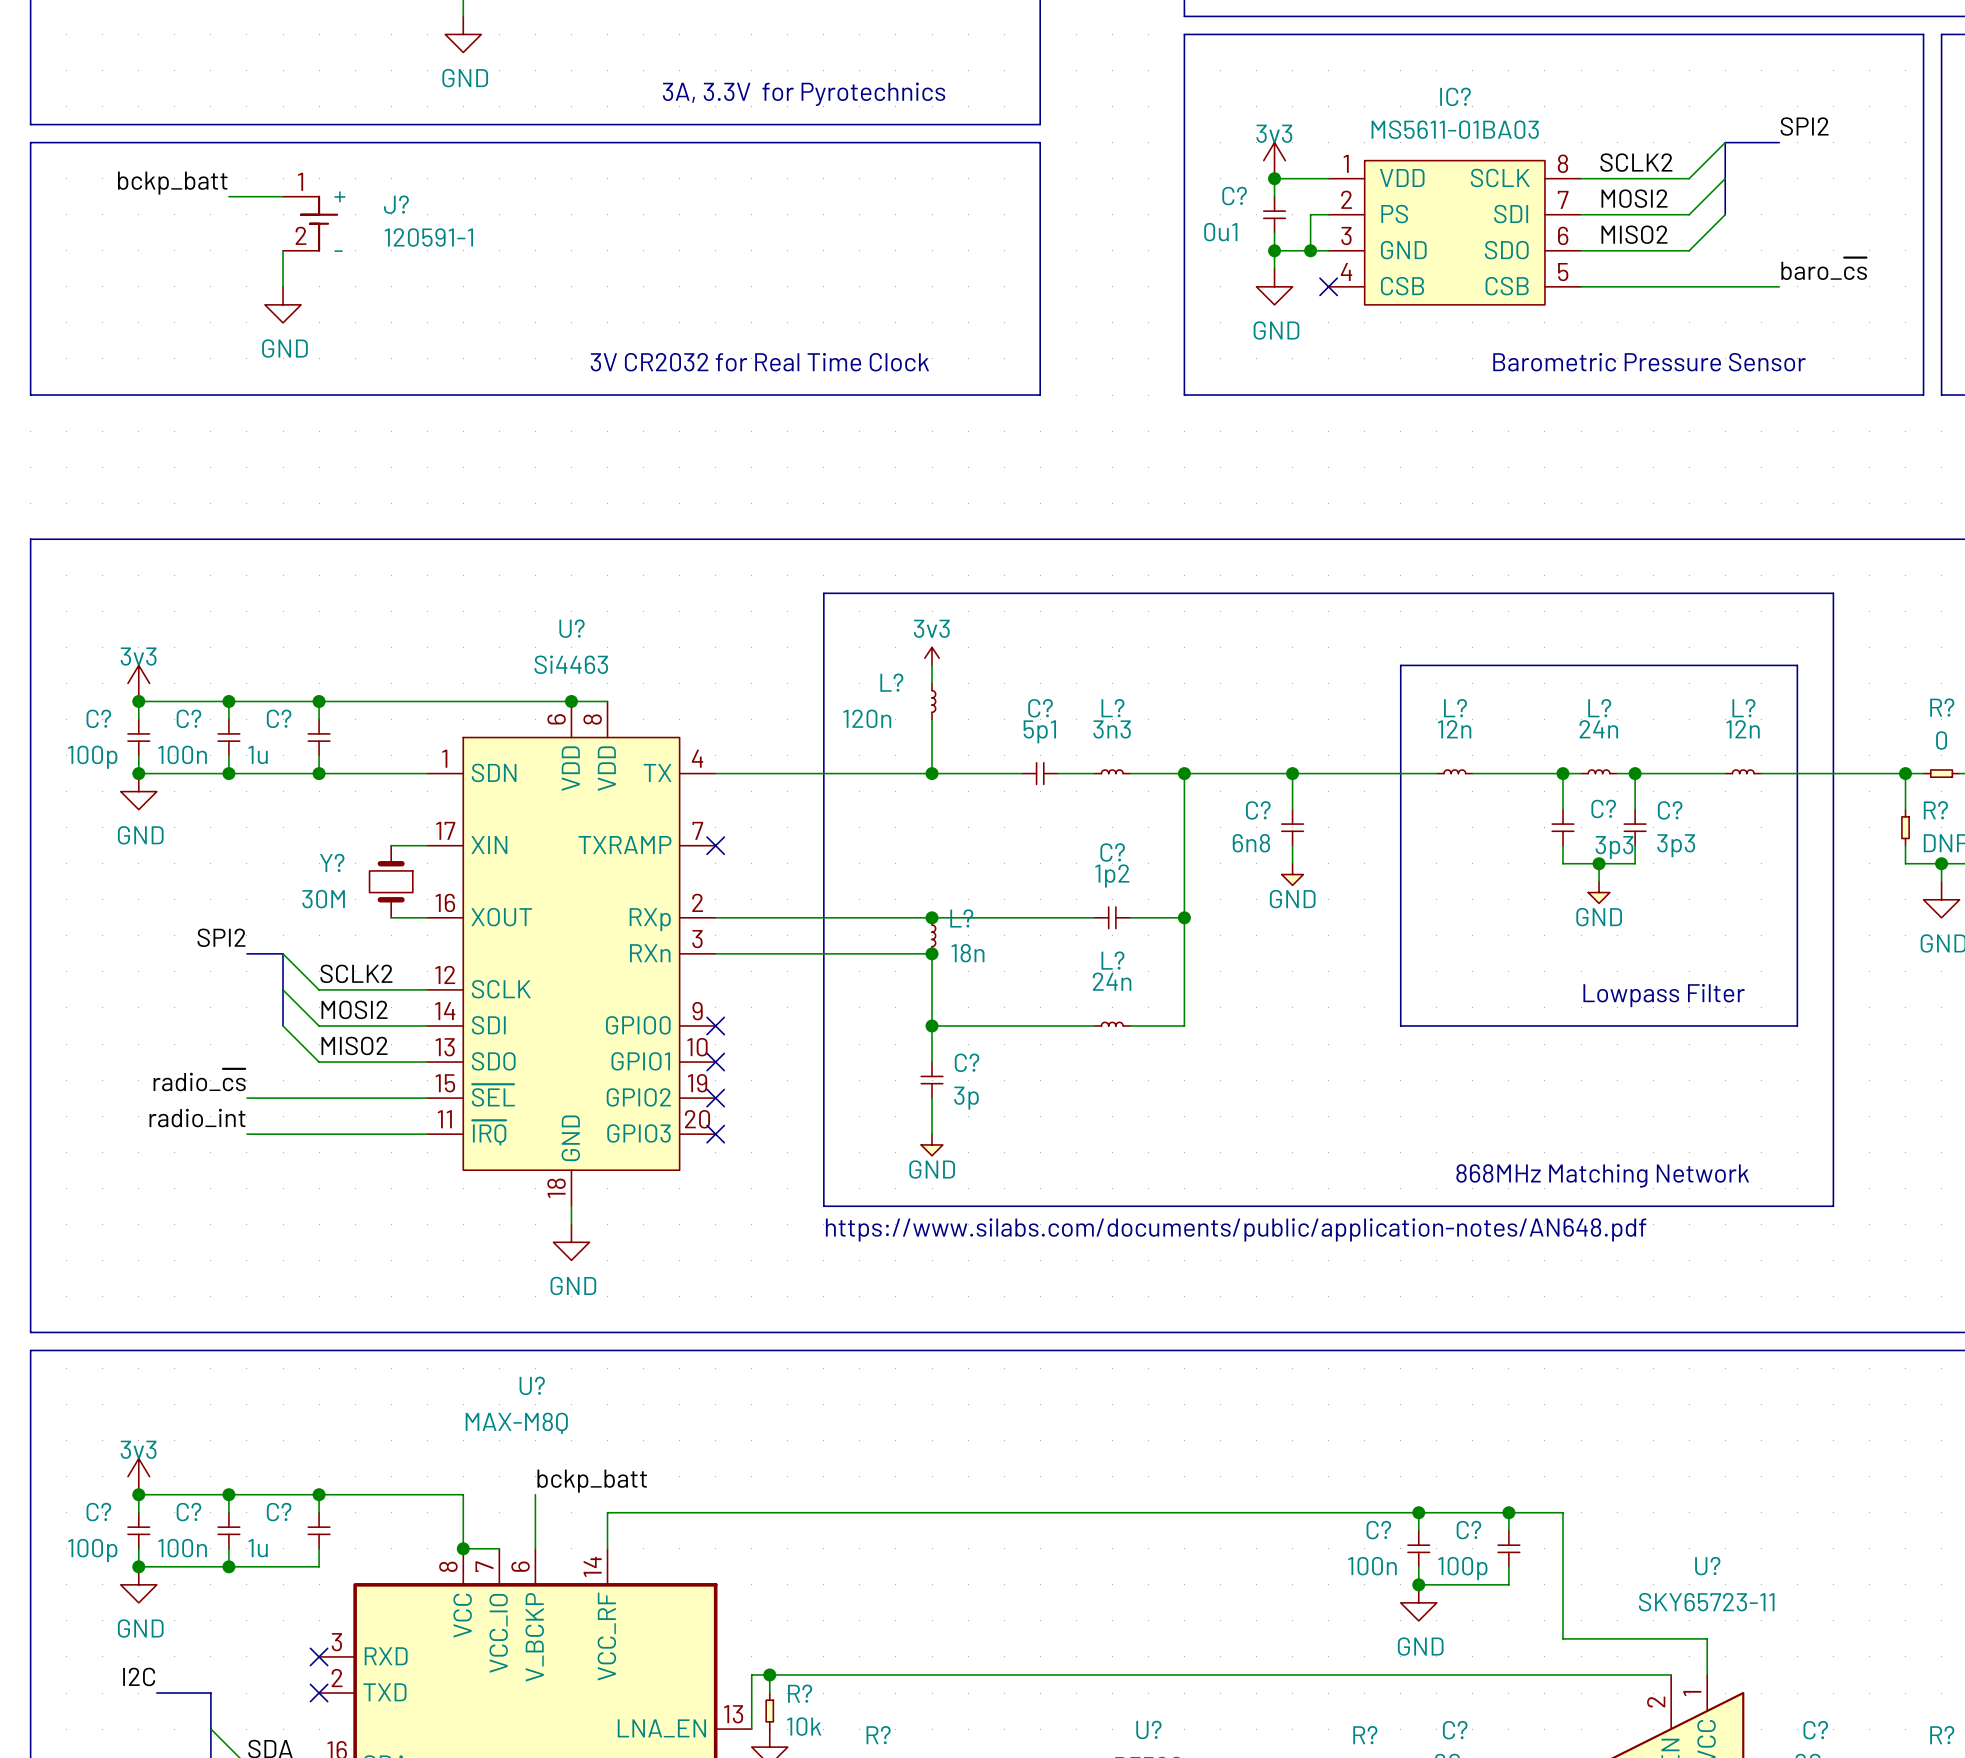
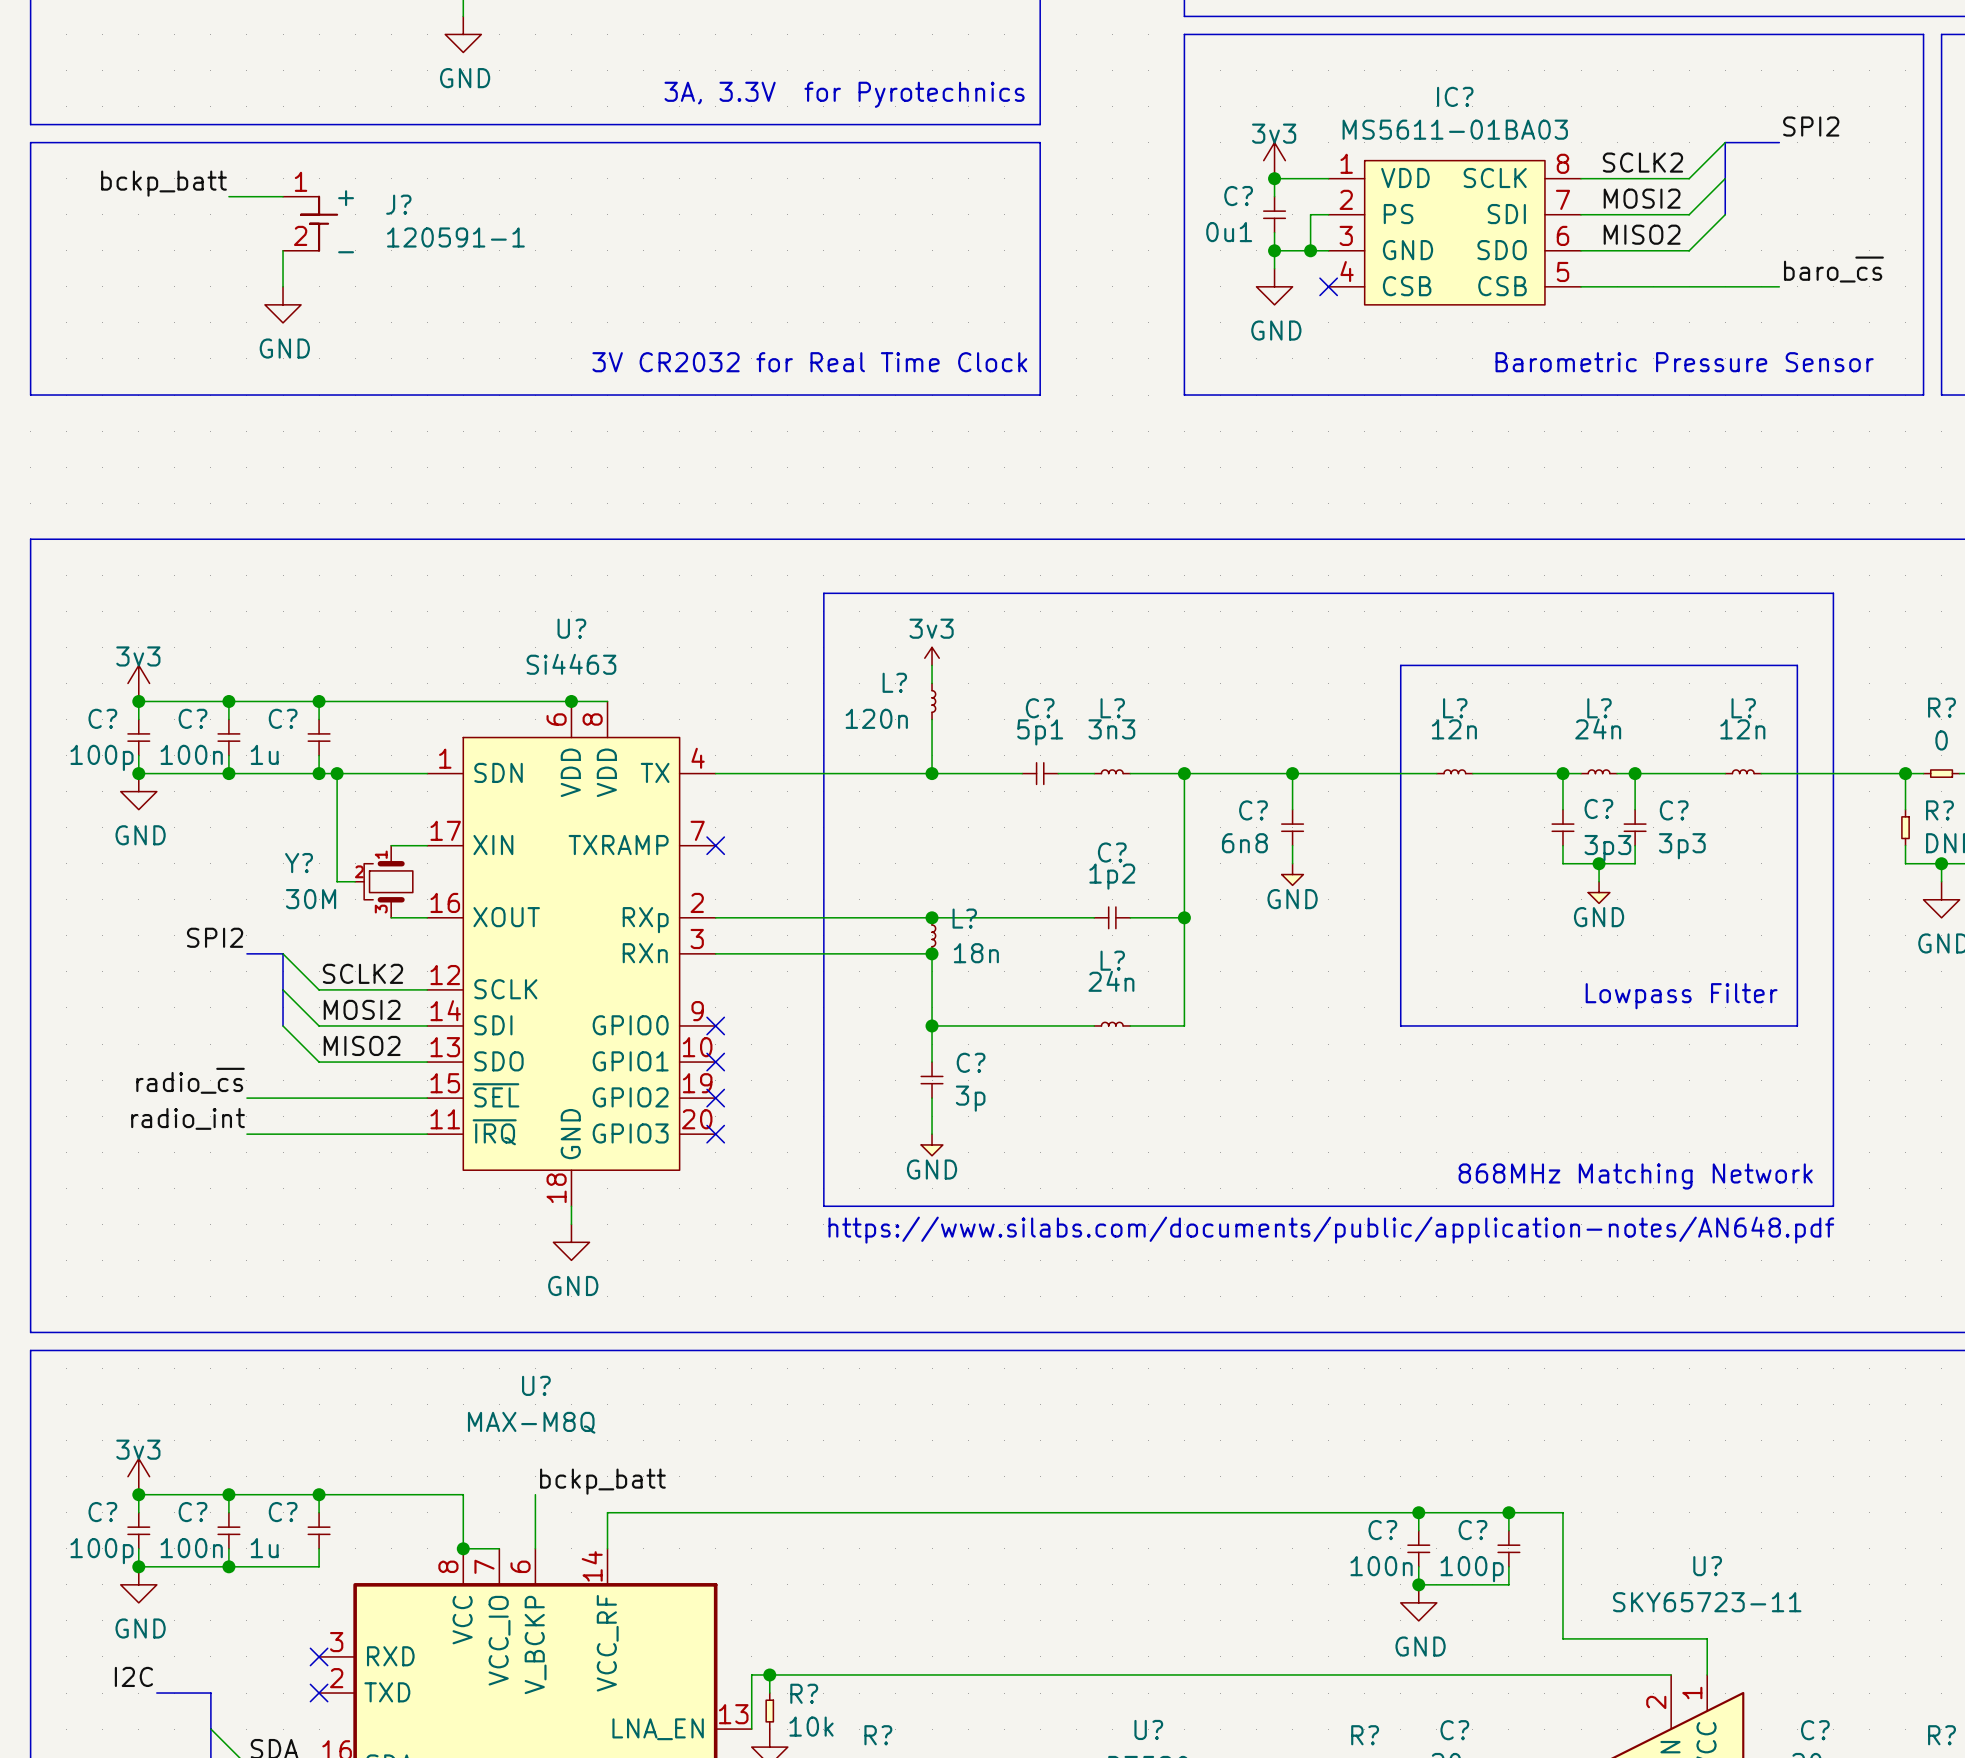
wire: none -> (337, 773) (337, 881) (355, 881)
junction: none -> (337, 773)
Y? symbol: [369, 845, 413, 918] -> [355, 845, 413, 918]
Y? name position: Y? (332, 862) -> Y? (299, 863)

